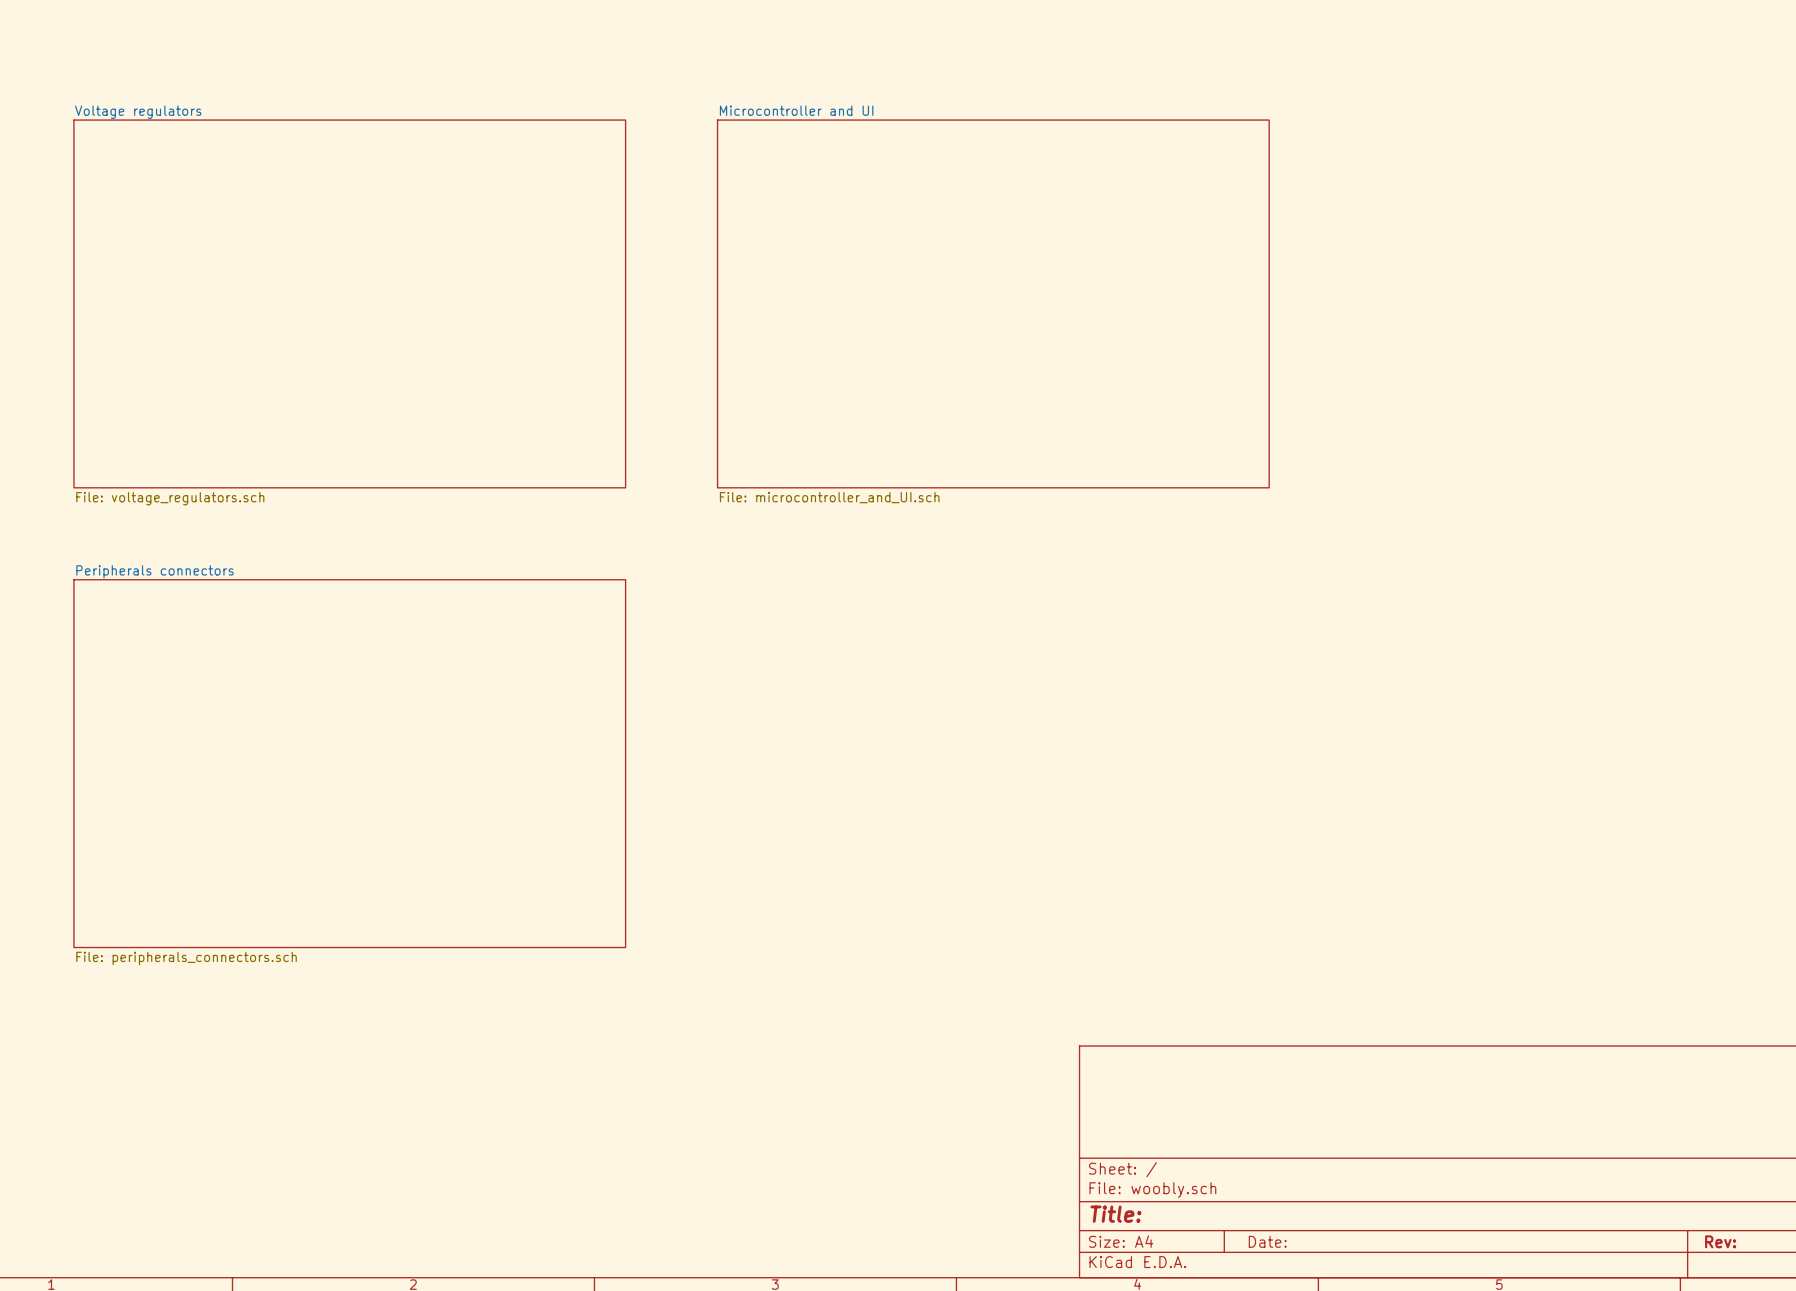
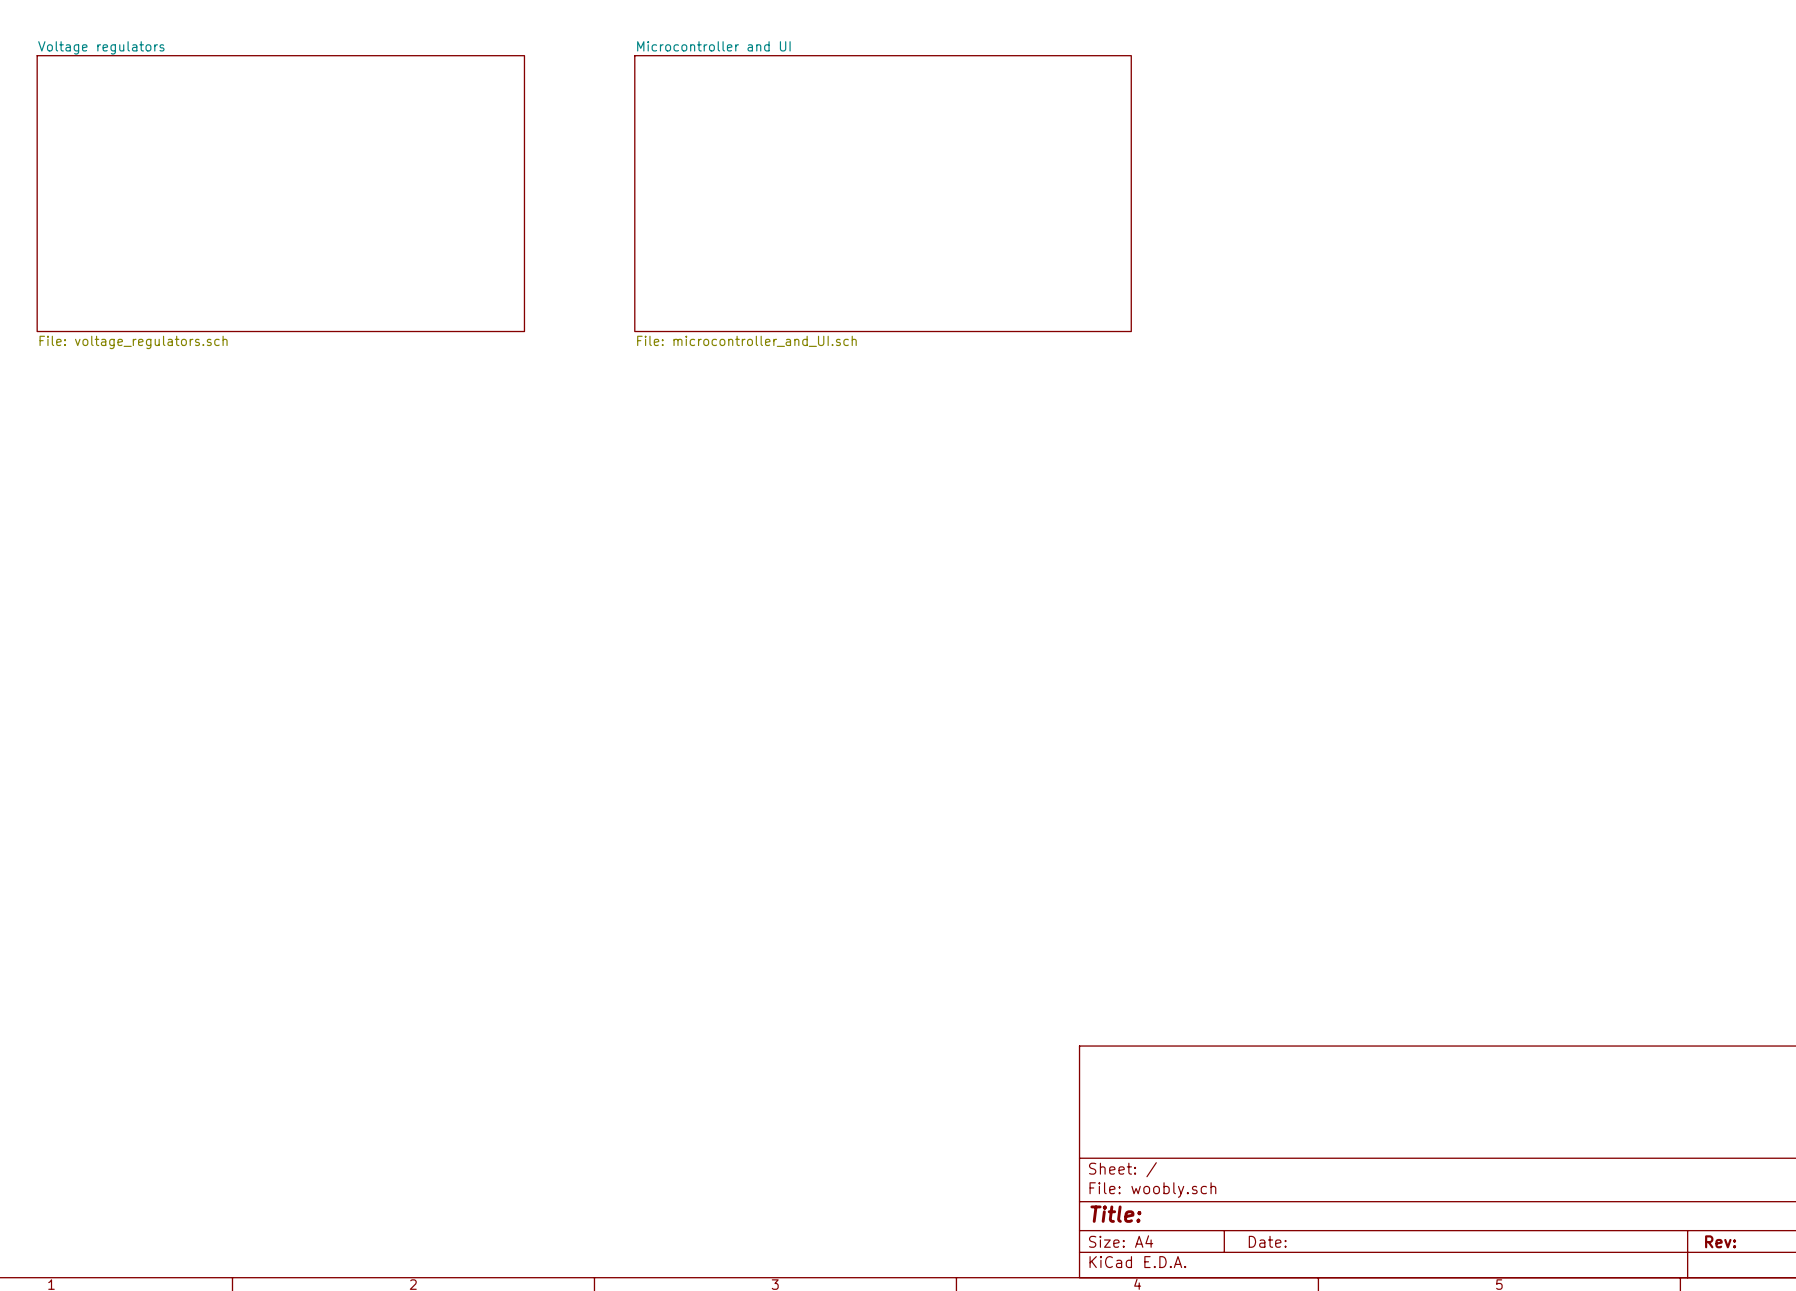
sheet Voltage regulators: none -> File: voltage_regulators.sch (280, 193)
sheet Microcontroller and UI: none -> File: microcontroller_and_UI.sch (883, 193)
sheet Voltage regulators: File: voltage_regulators.sch (349, 303) -> none
sheet Microcontroller and UI: File: microcontroller_and_UI.sch (993, 303) -> none
sheet Peripherals connectors: File: peripherals_connectors.sch (349, 763) -> none

